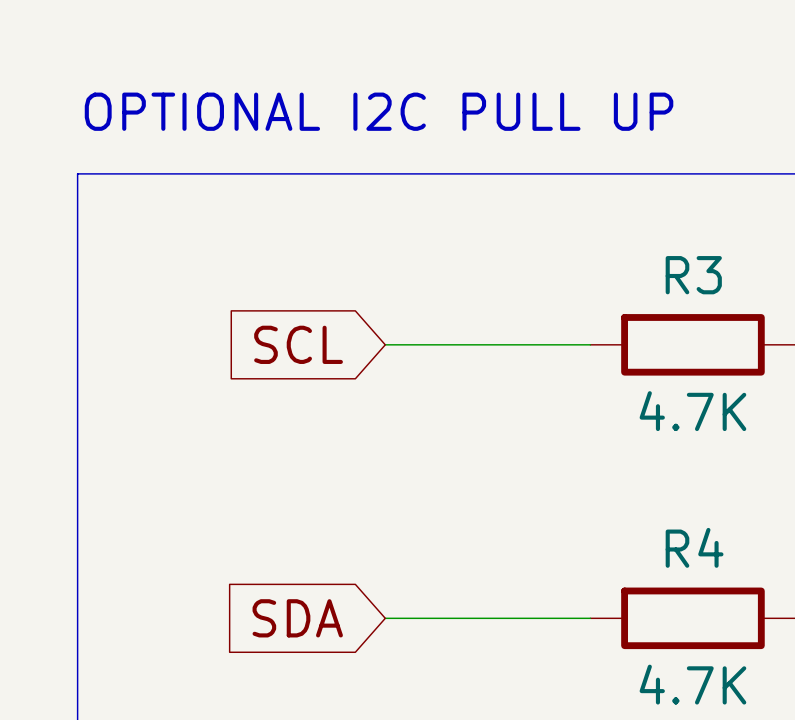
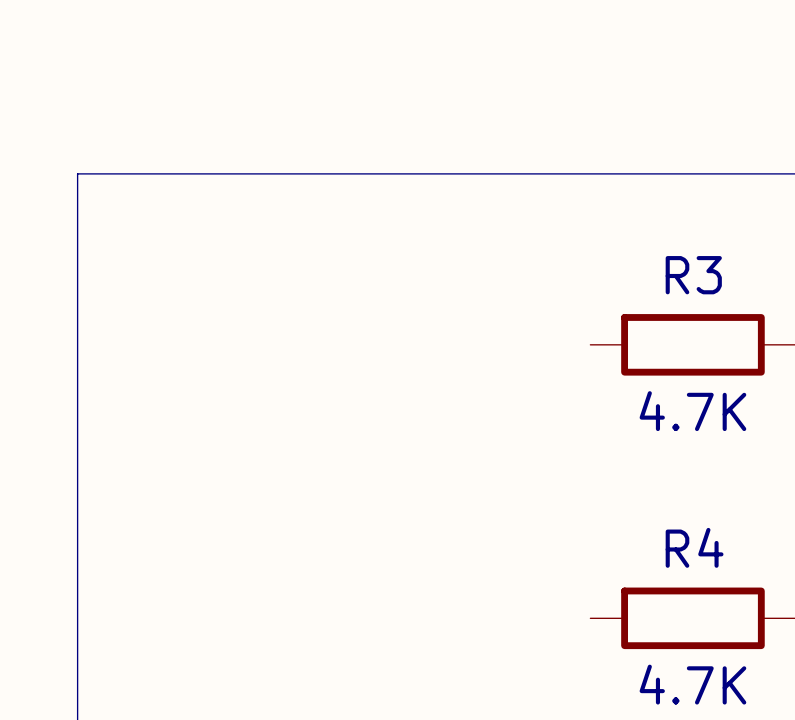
text: OPTIONAL I2C PULL UP (379, 111) -> none
global label: SCL (298, 344) -> none
wire: (385, 344) (590, 344) -> none
global label: SDA (297, 618) -> none
wire: (385, 618) (590, 618) -> none

